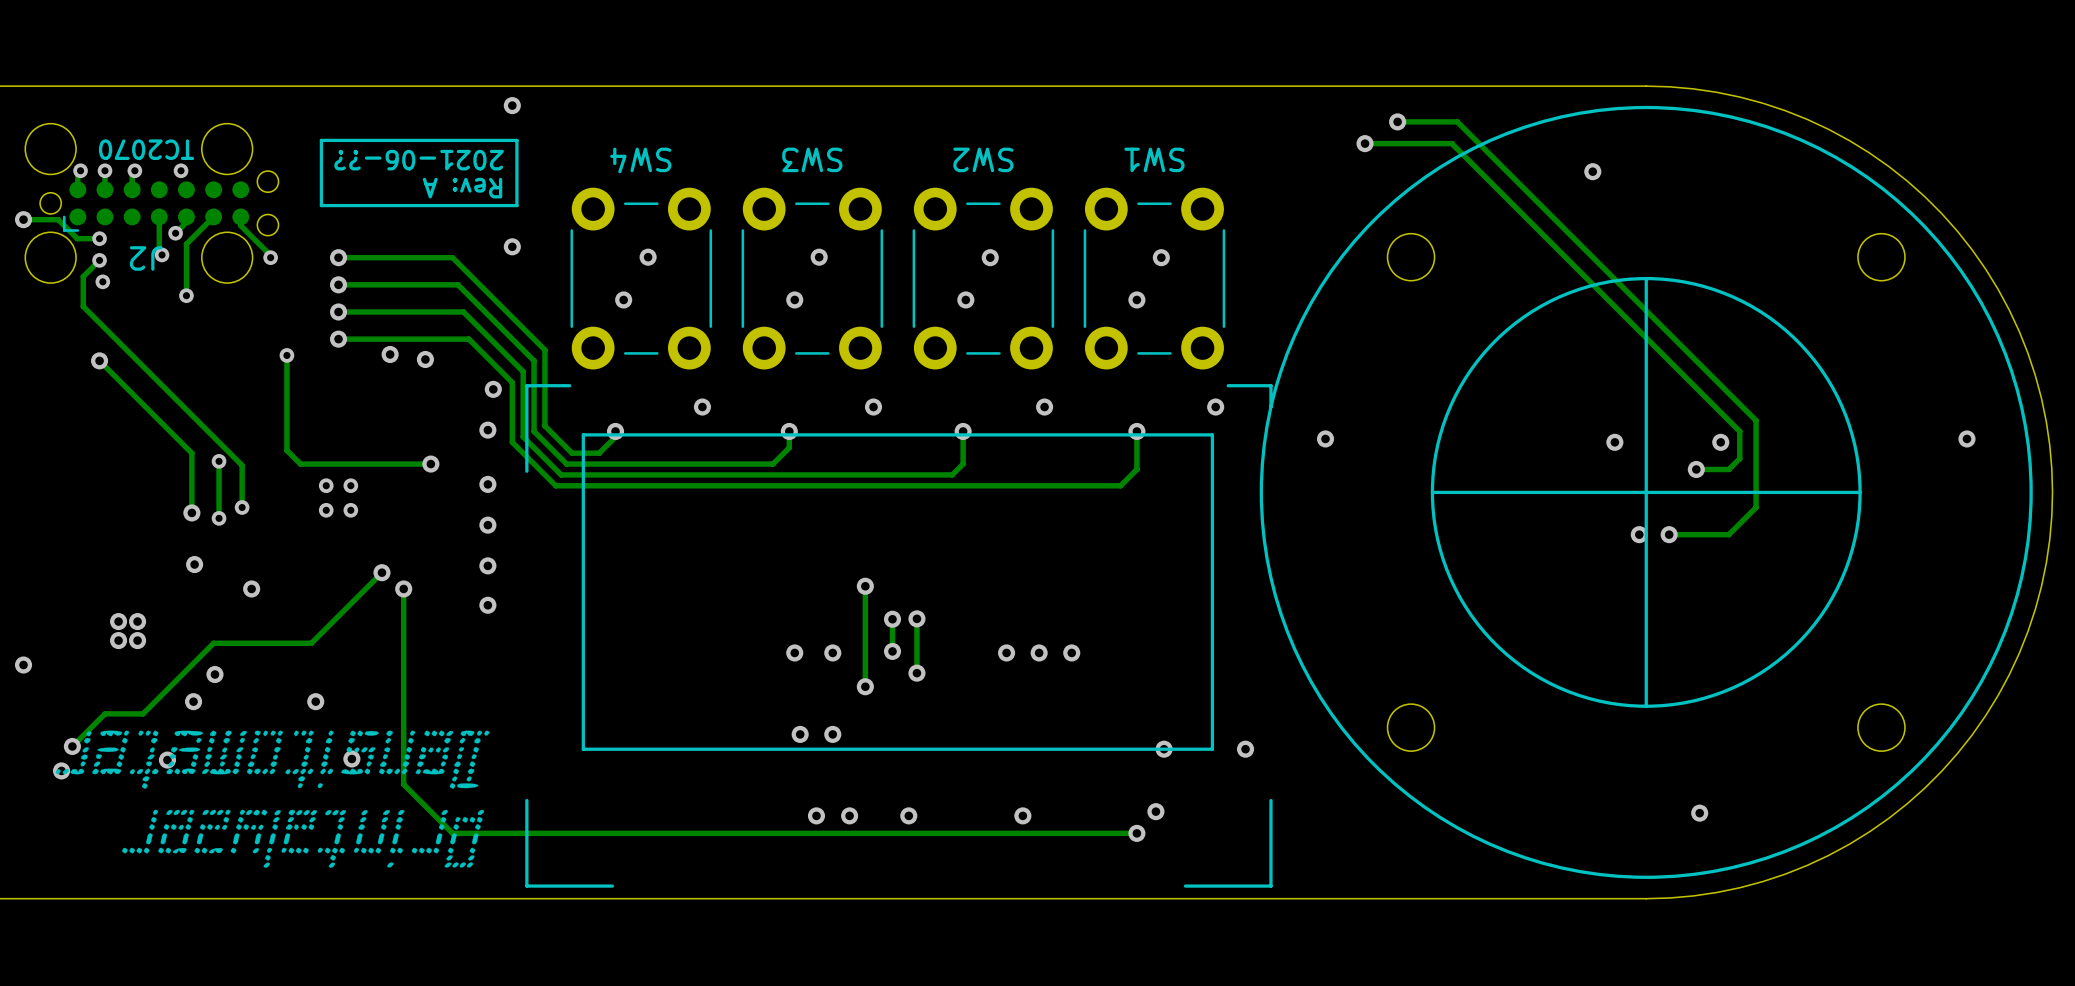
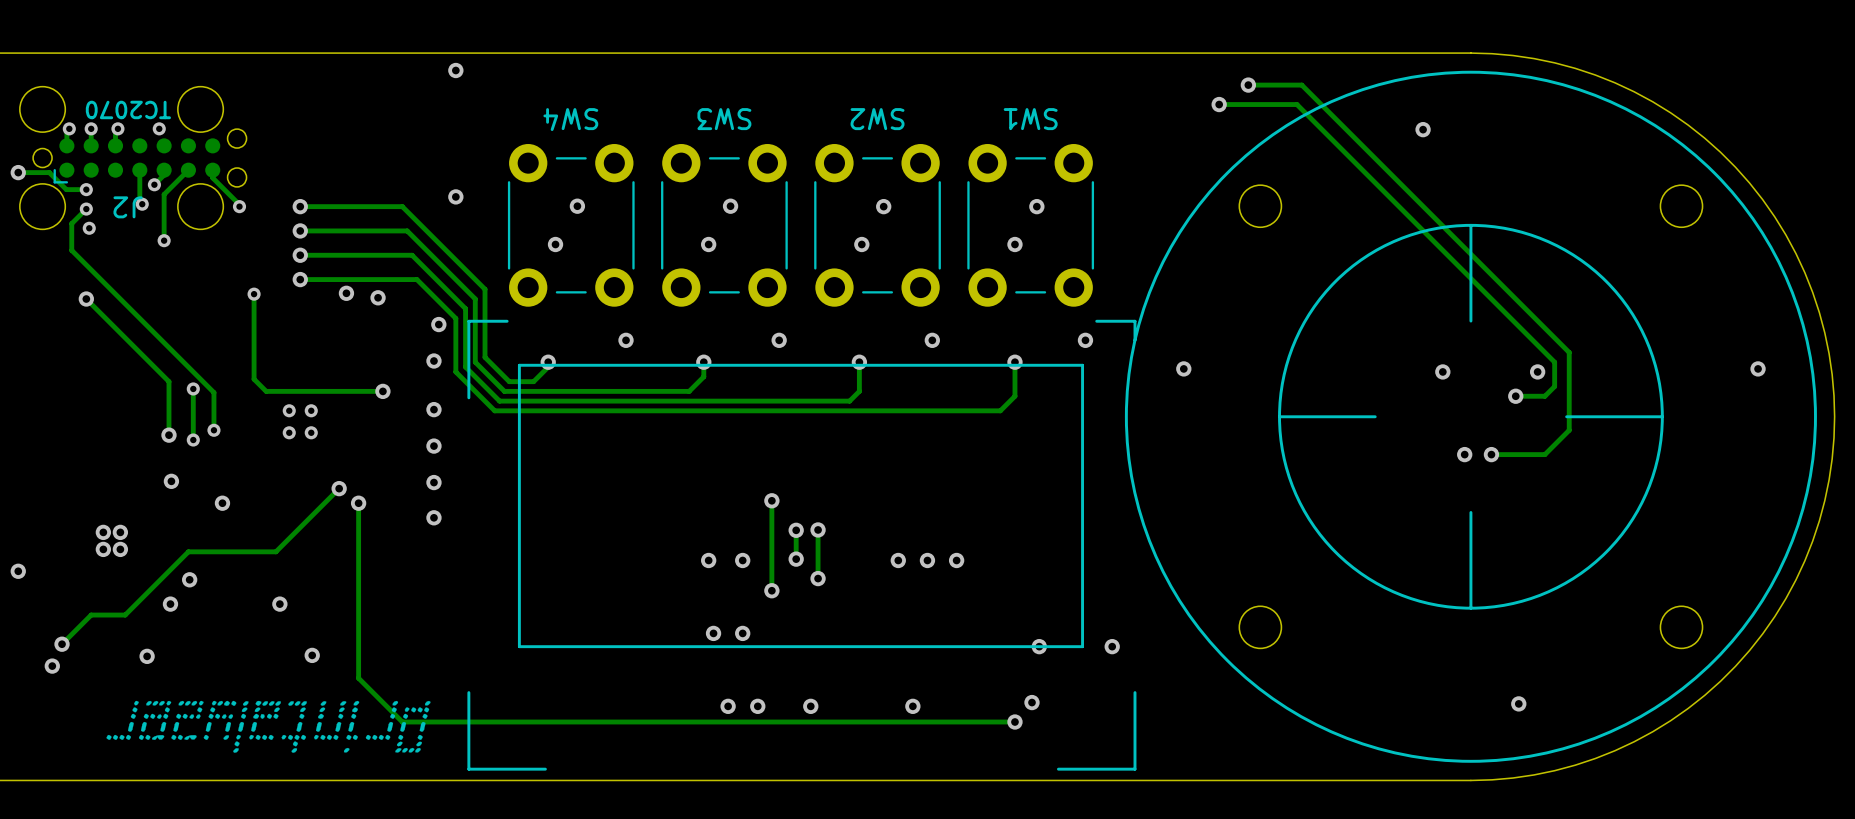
line: (516, 140) (516, 205) (321, 205) (321, 140) (516, 140) -> none
text: 2021-06-?? (419, 160) -> none
text: Rev: A (462, 188) -> none
line: (1646, 385) (1646, 599) -> none
line: (1753, 492) (1539, 492) -> none
drawing: [55, 730, 490, 789] -> none

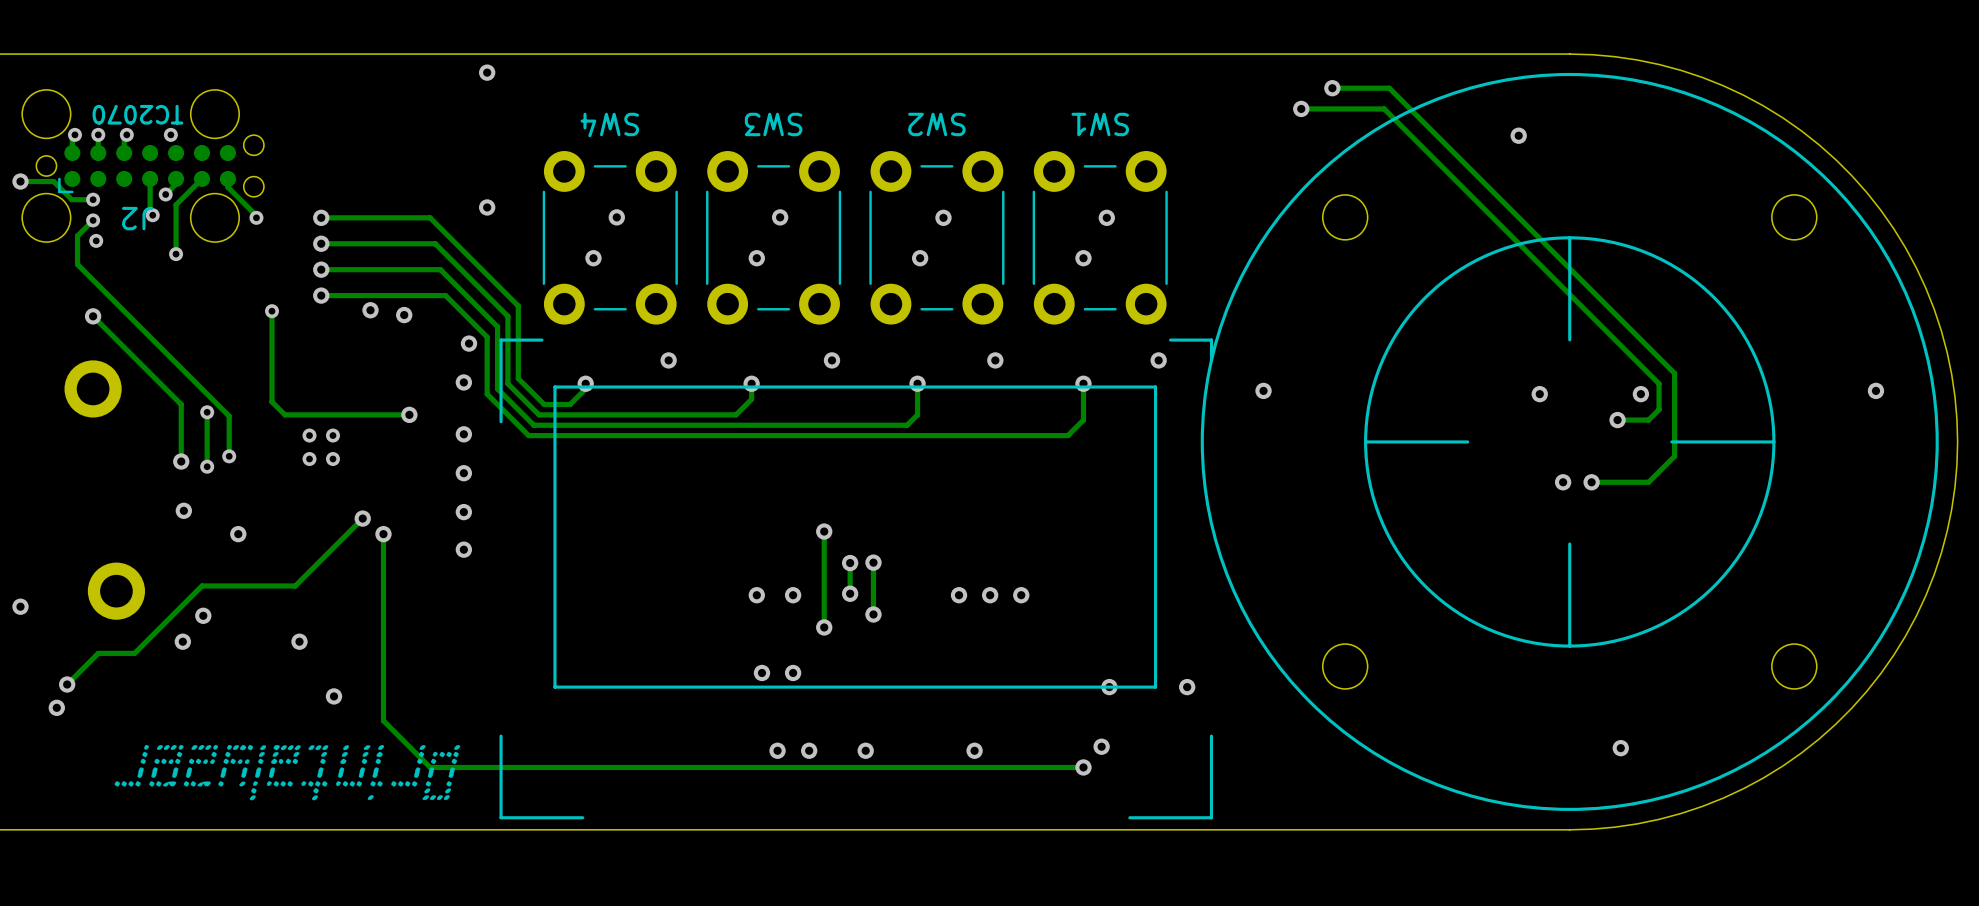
part: none -> (93, 388)
via: (103, 532) -> none
via: (120, 532) -> none
via: (103, 549) -> none
via: (120, 549) -> none
part: none -> (116, 591)
via: (147, 656) -> none

